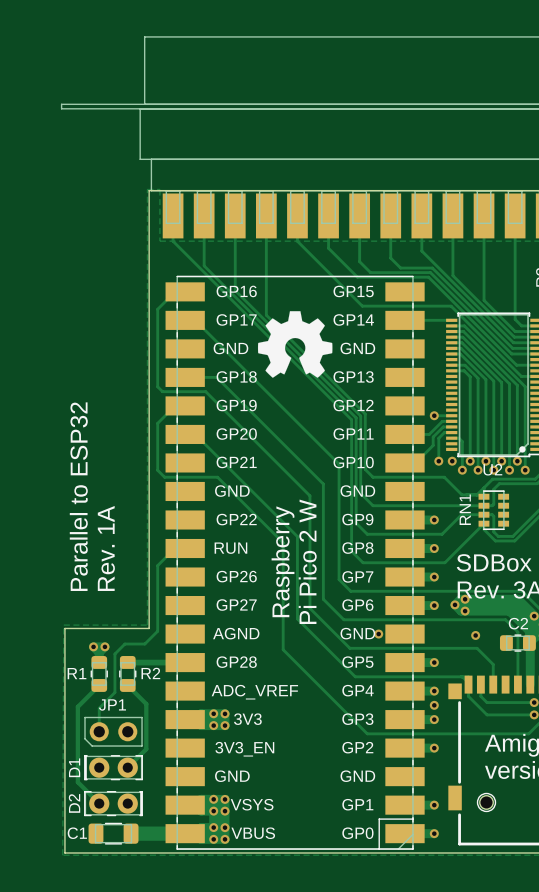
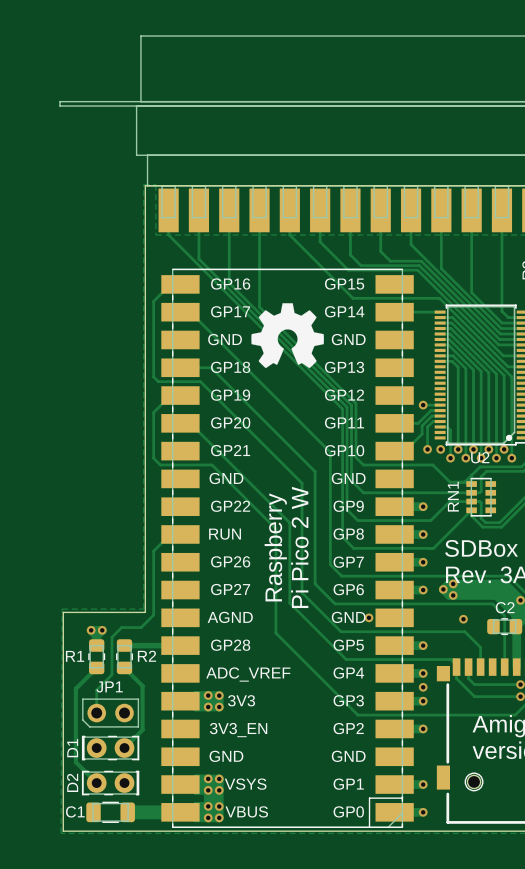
text: Parallel to ESP32 (78, 496) -> none
text: Rev. 1A (106, 548) -> none

